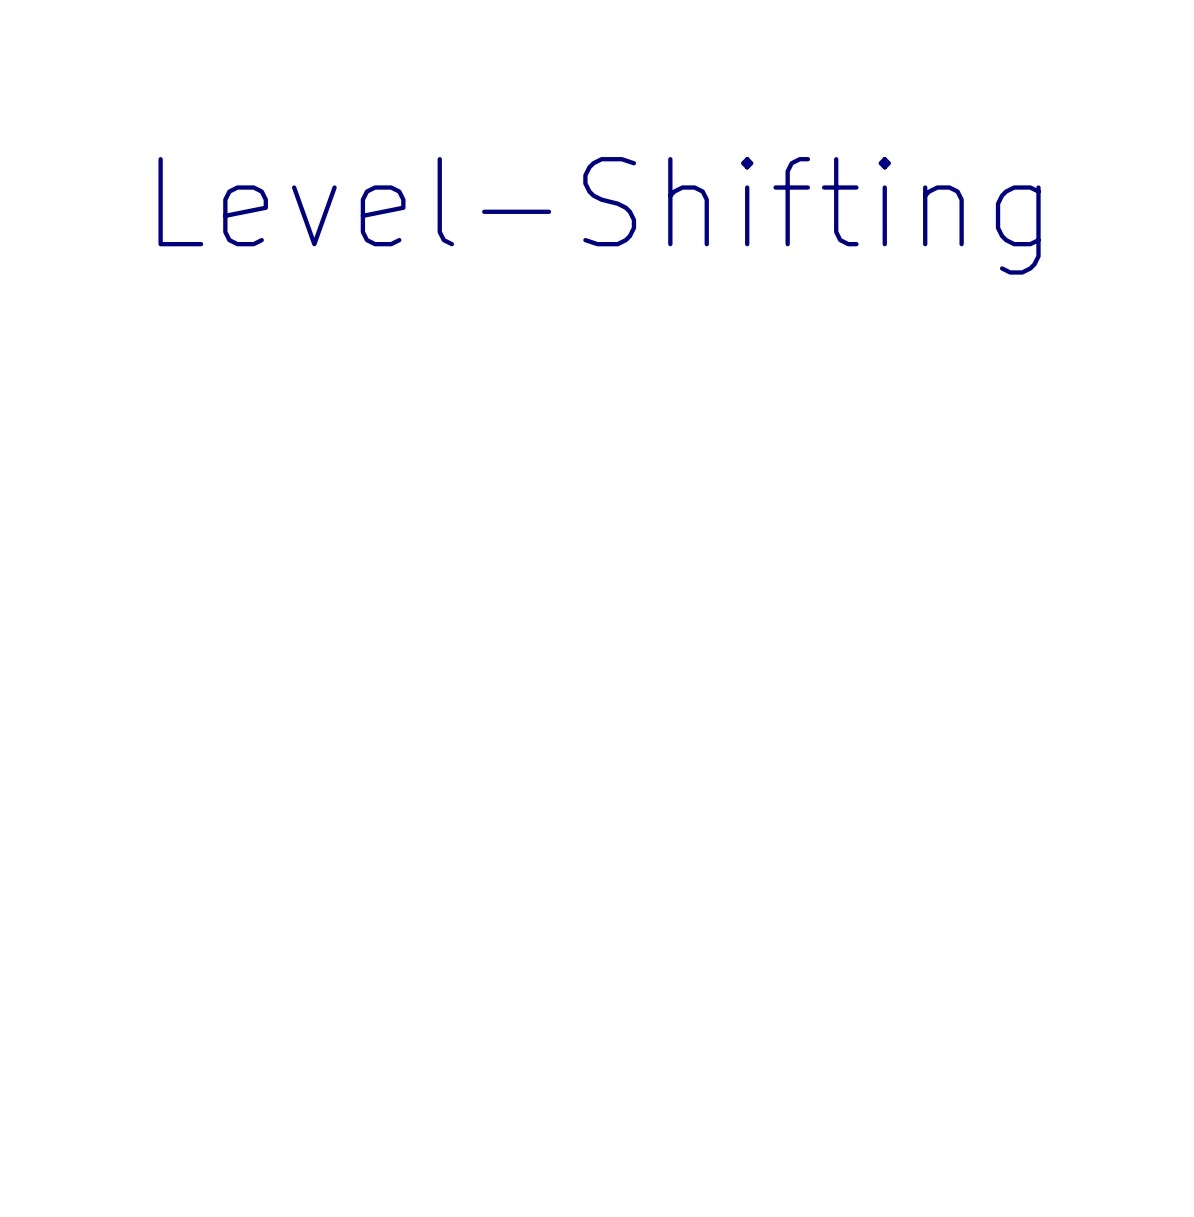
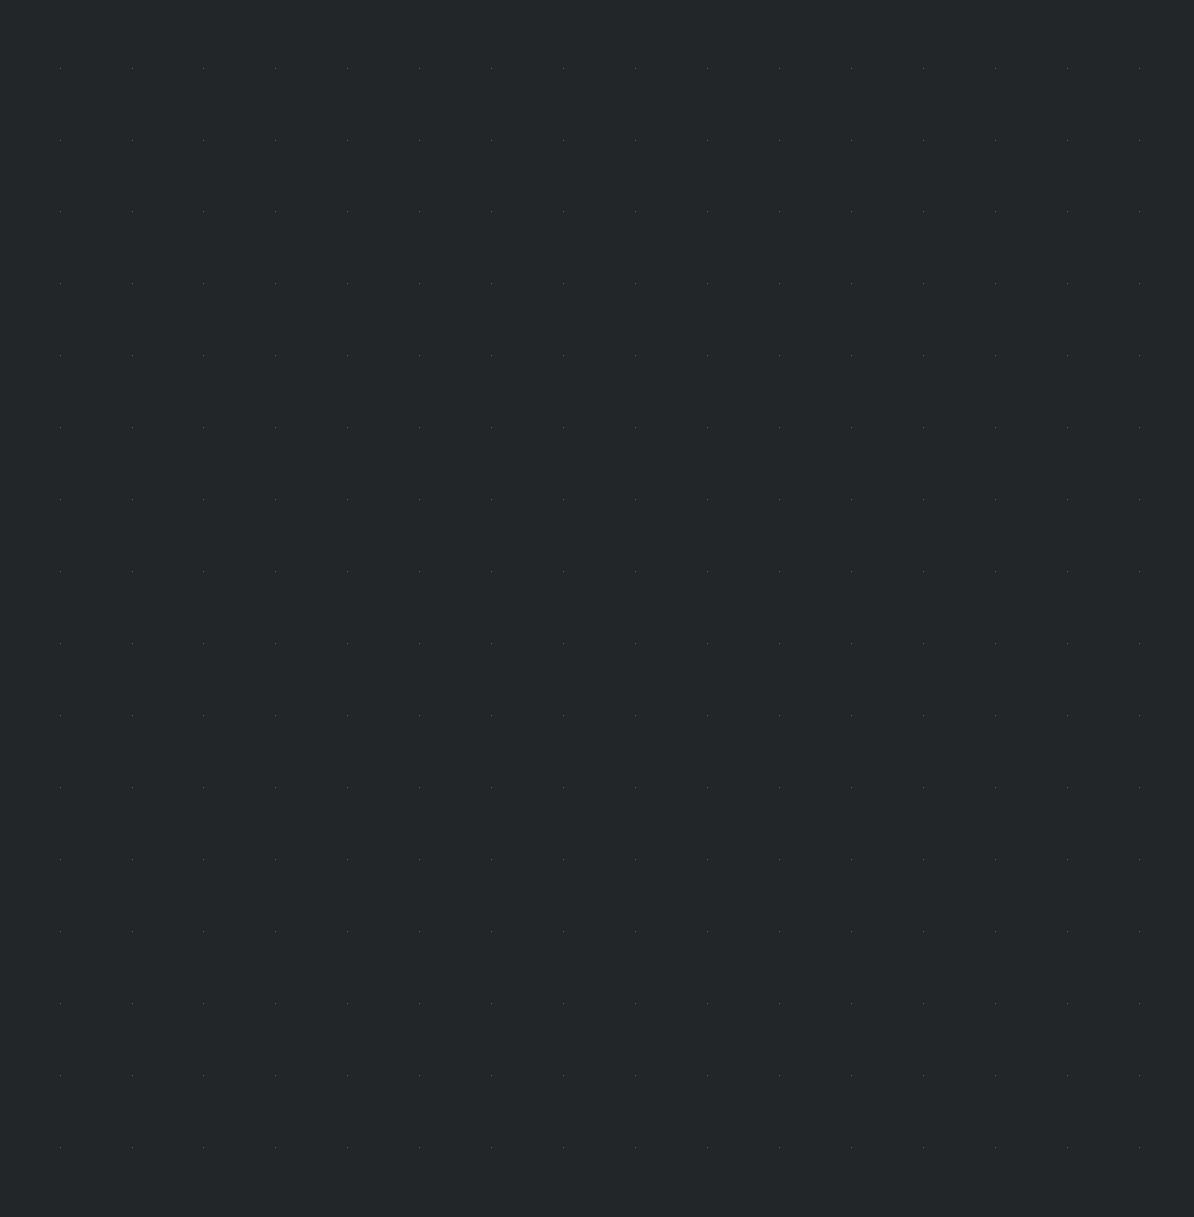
text: Level-Shifting (599, 215) -> none

